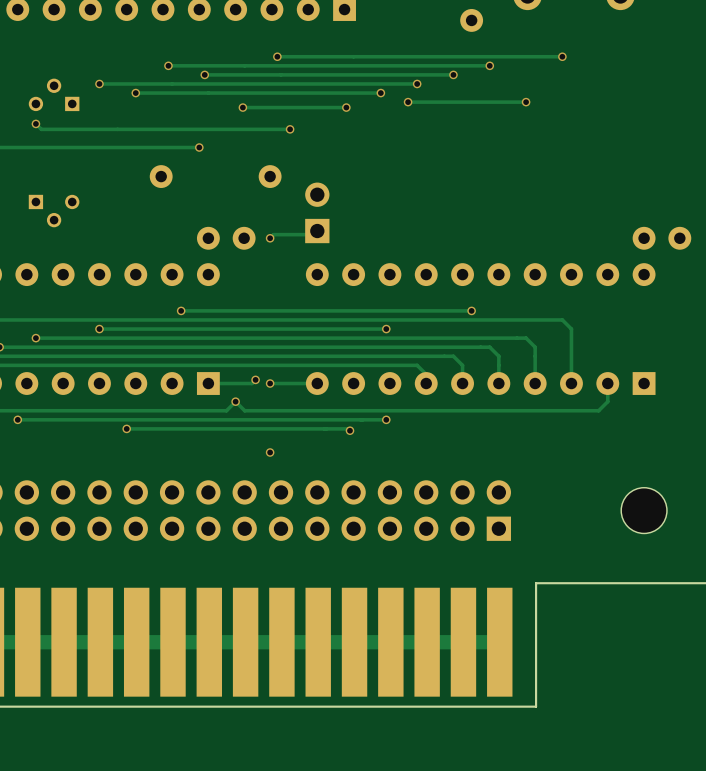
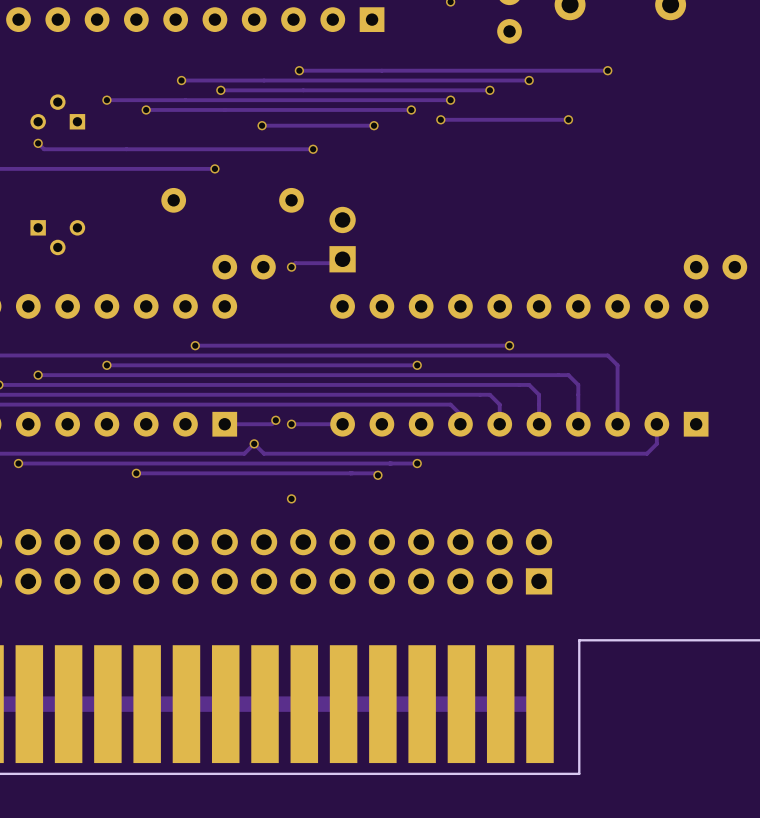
part: (644, 510) -> none

